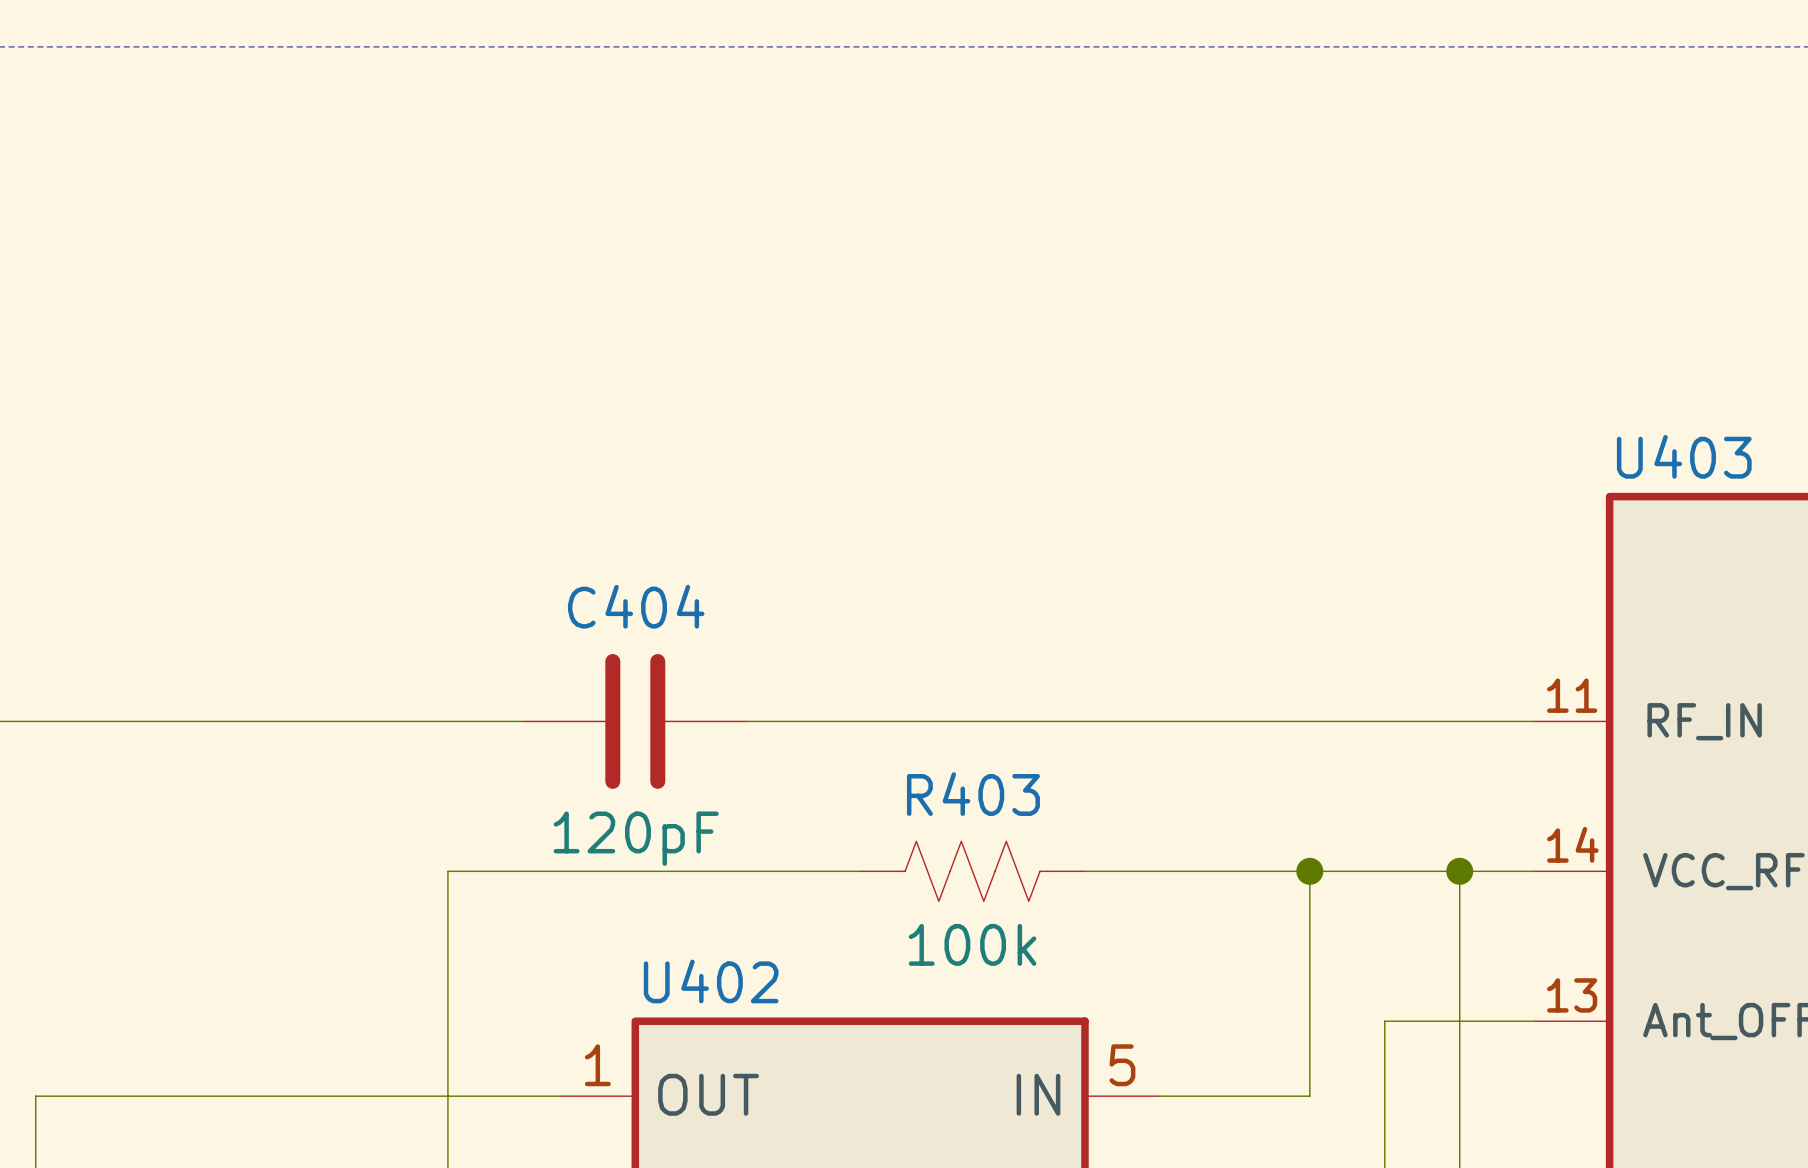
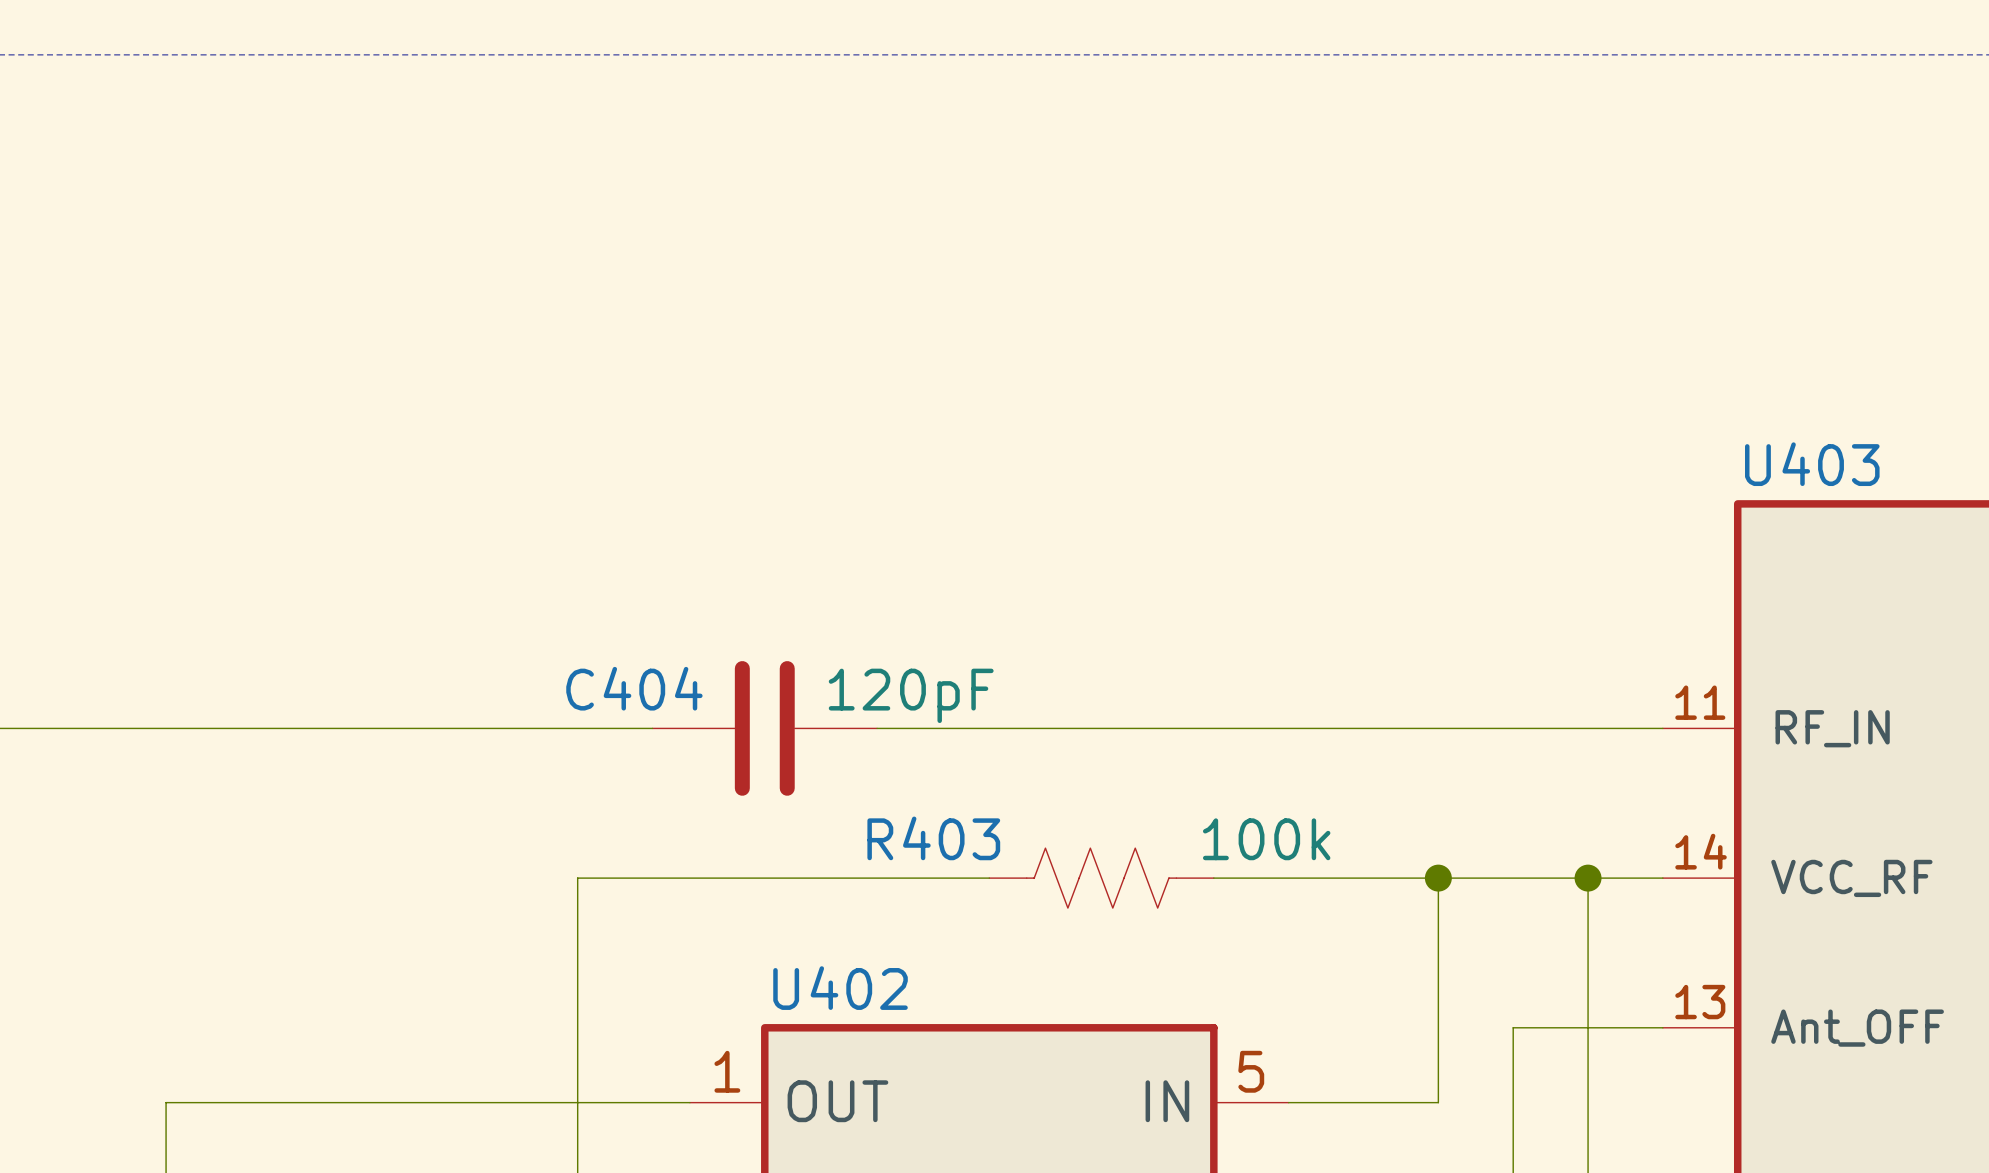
C404 name position: C404 (636, 606) -> C404 (634, 688)
R403 name position: R403 (973, 794) -> R403 (933, 838)
C404 value position: 120pF (636, 838) -> 120pF (911, 695)
R403 value position: 100k (972, 944) -> 100k (1266, 839)

